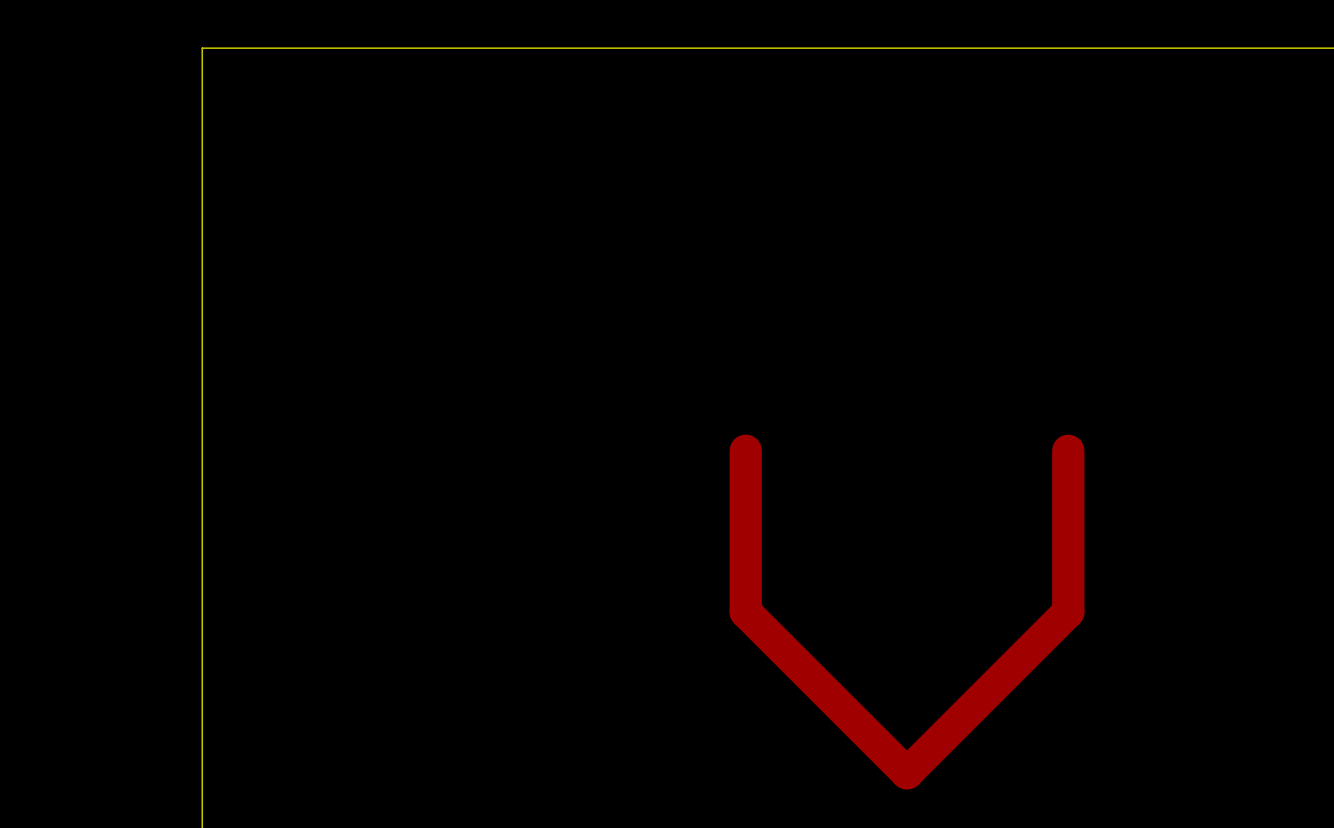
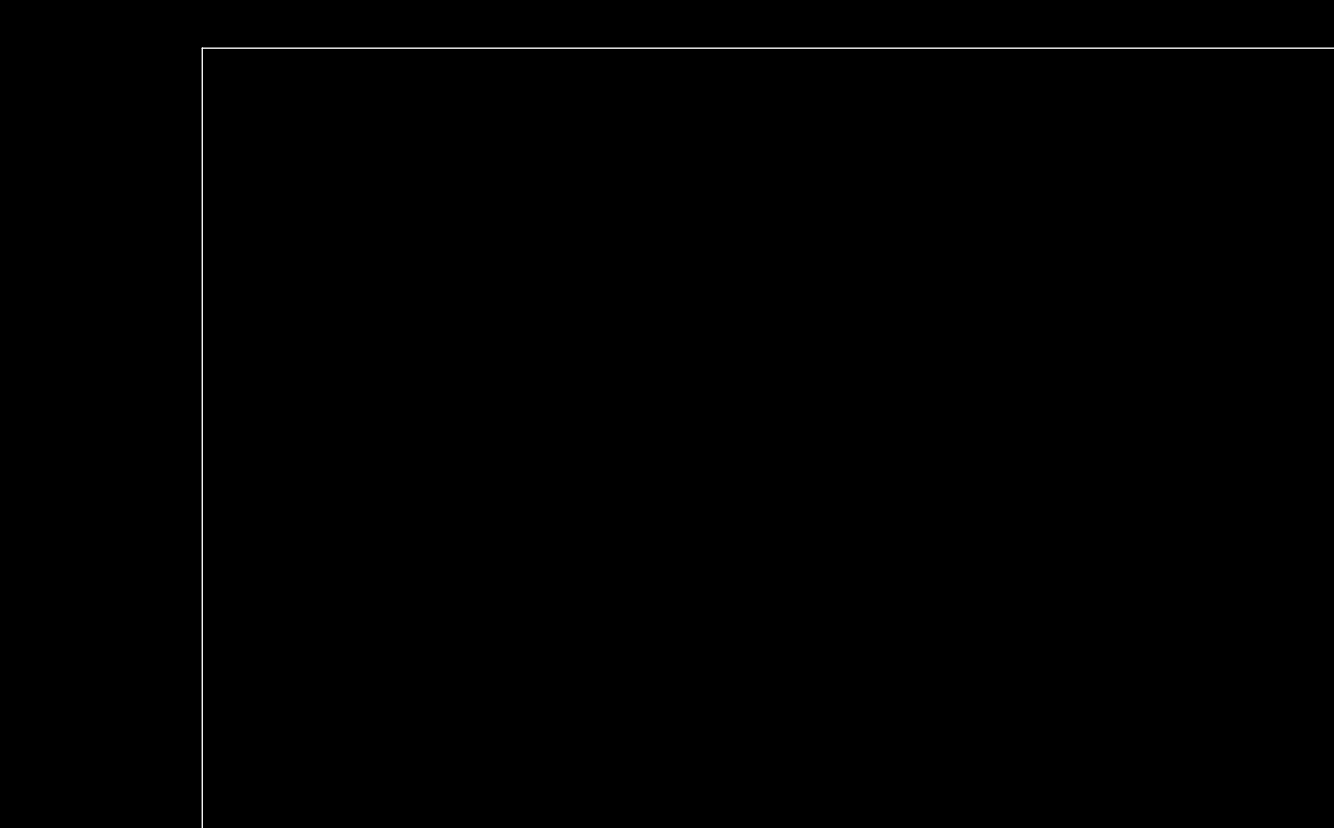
top track: (1068, 450) (1068, 611) (907, 773) (745, 611) (745, 450) -> none

